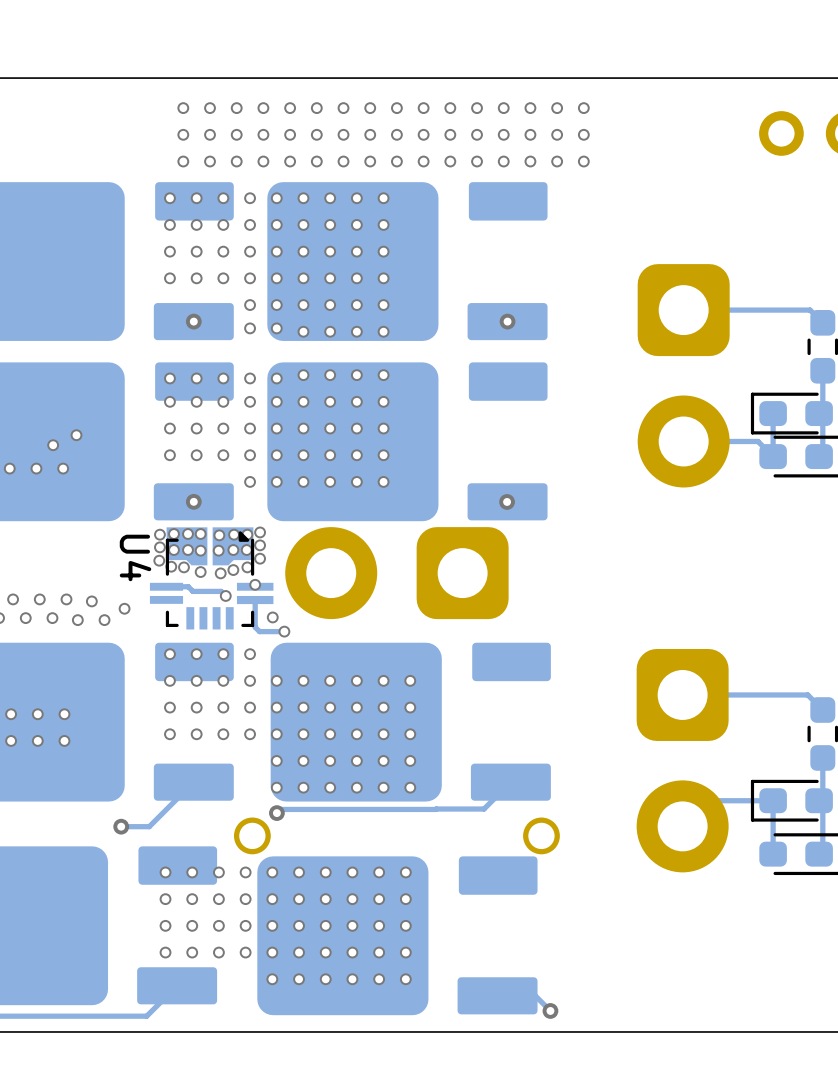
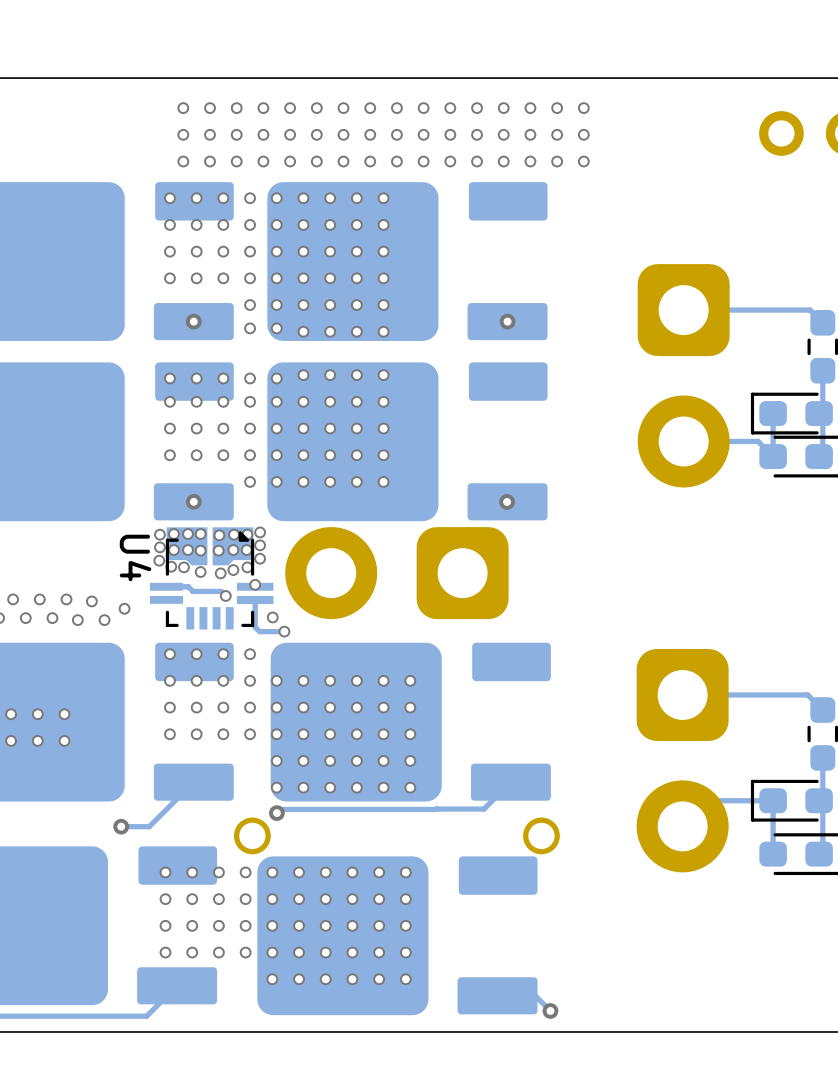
via: (76, 435) -> none
via: (53, 445) -> none
via: (9, 468) -> none
via: (36, 468) -> none
via: (63, 468) -> none

